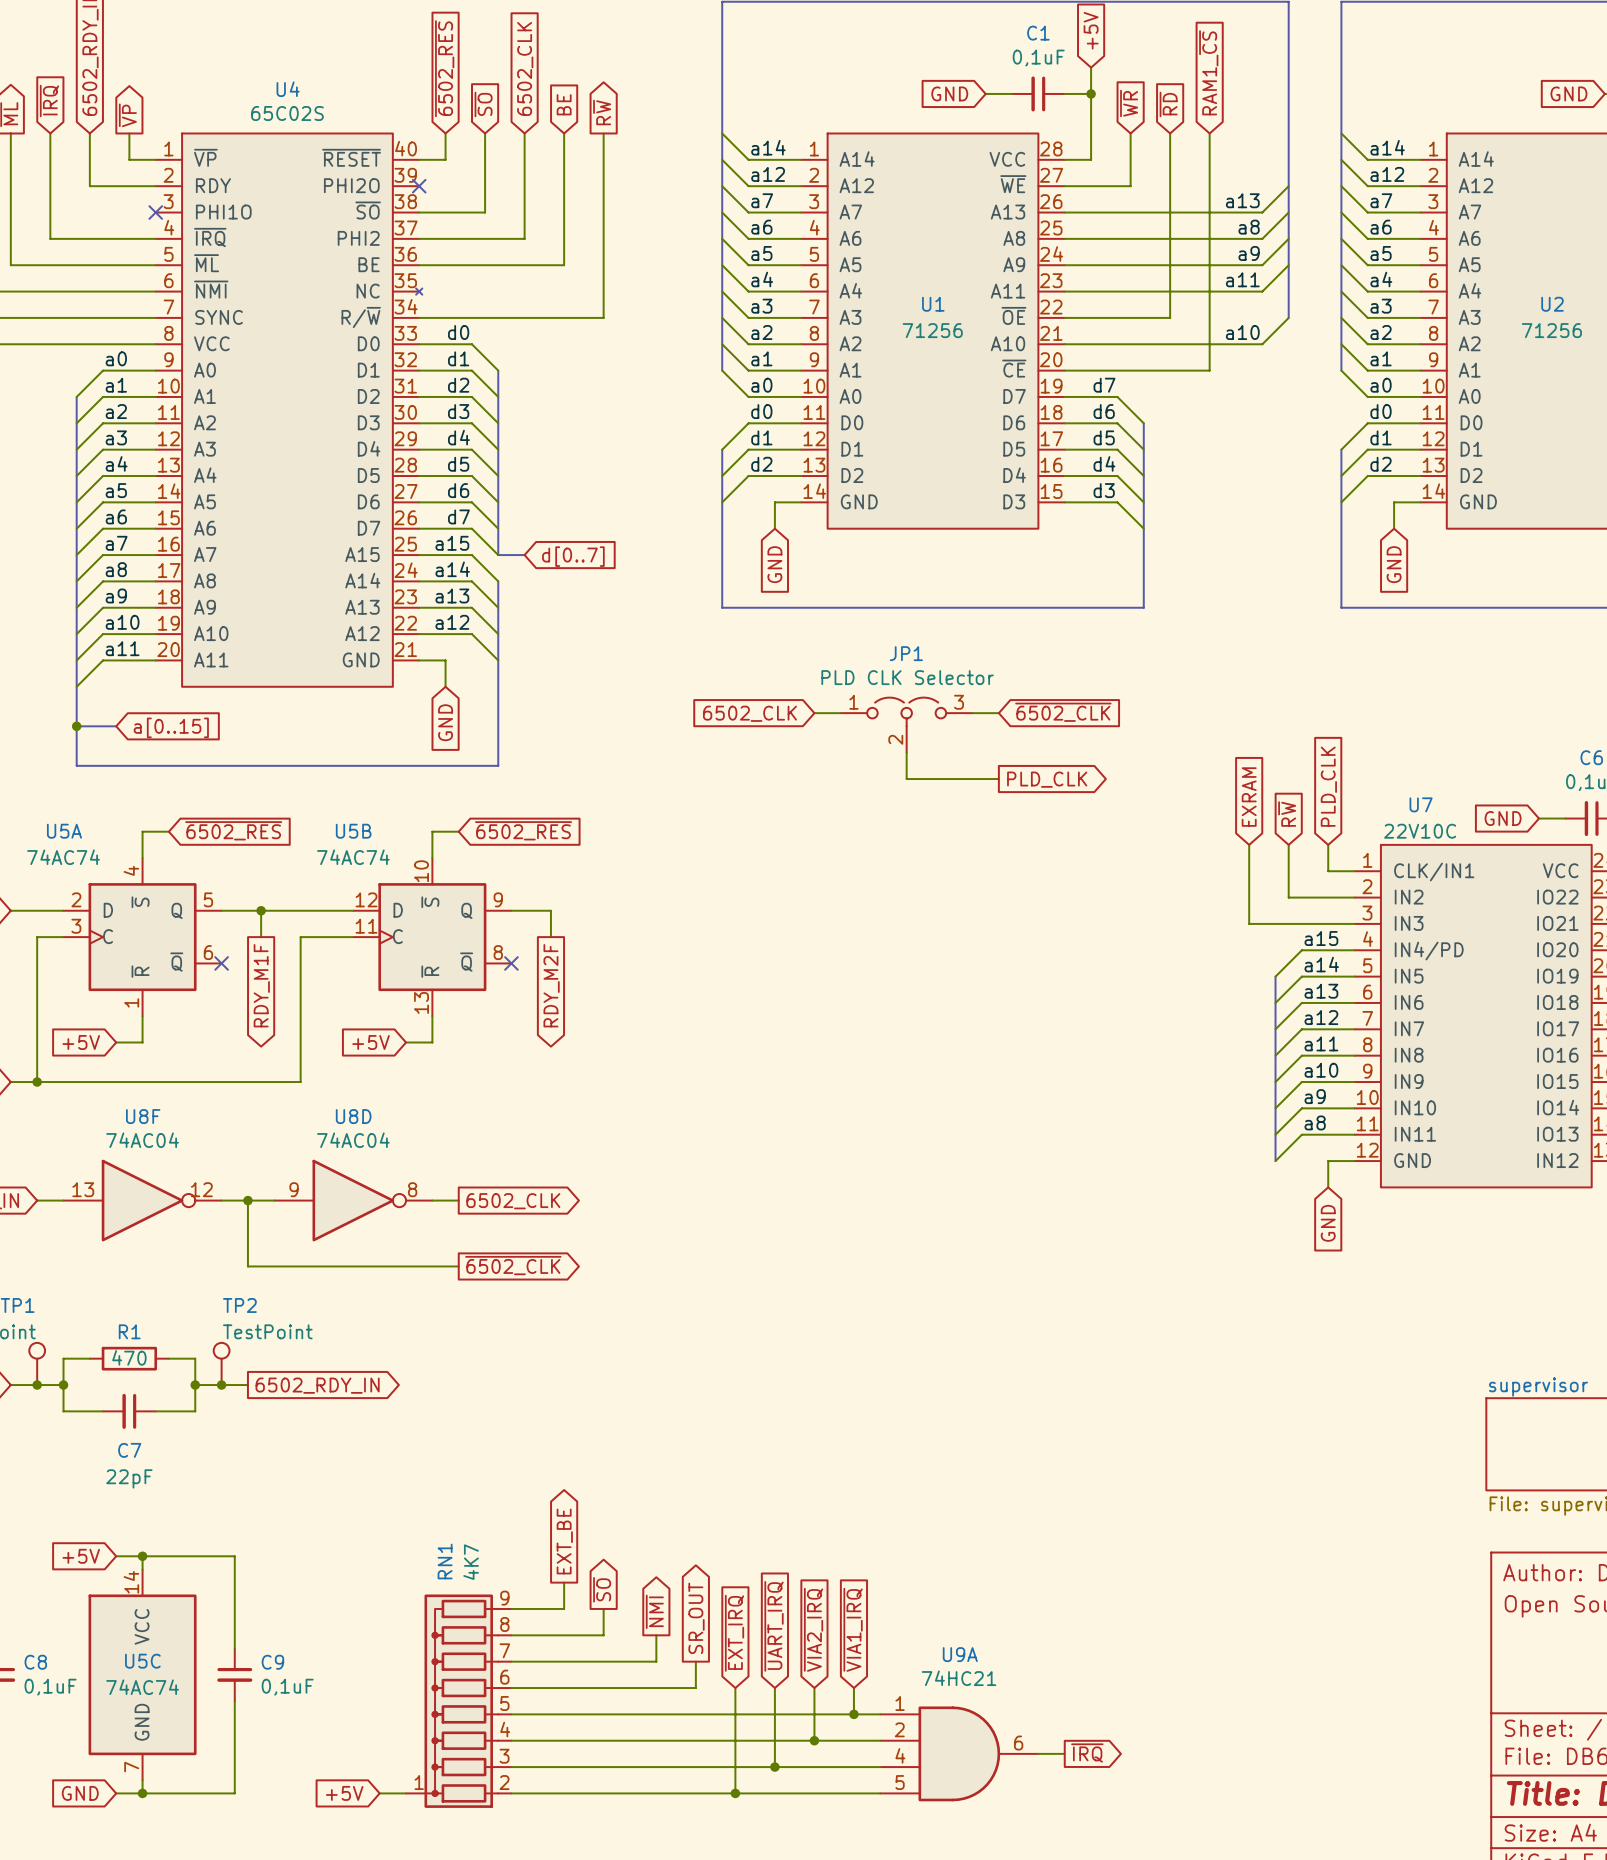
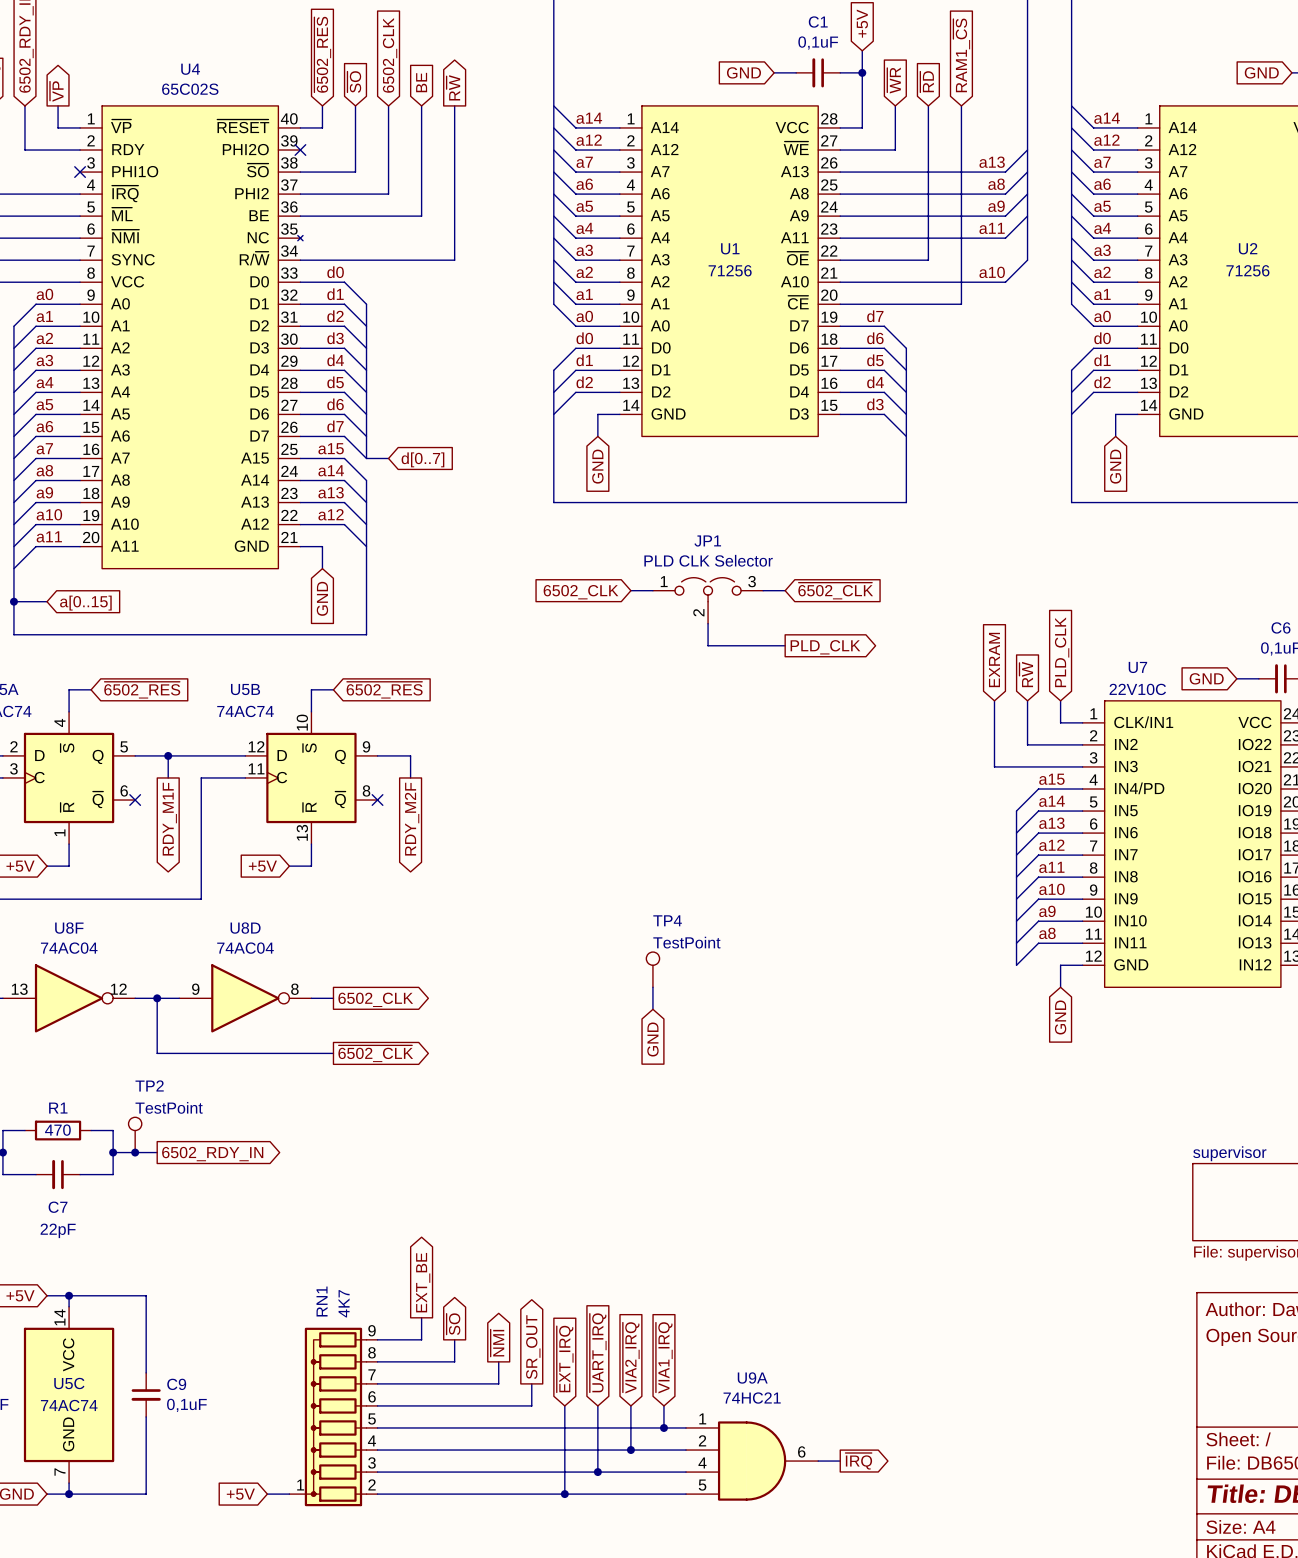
TP4: none -> TestPoint (652, 969)
wire: none -> (652, 987) (652, 1009)
global label: none -> GND (652, 1039)

